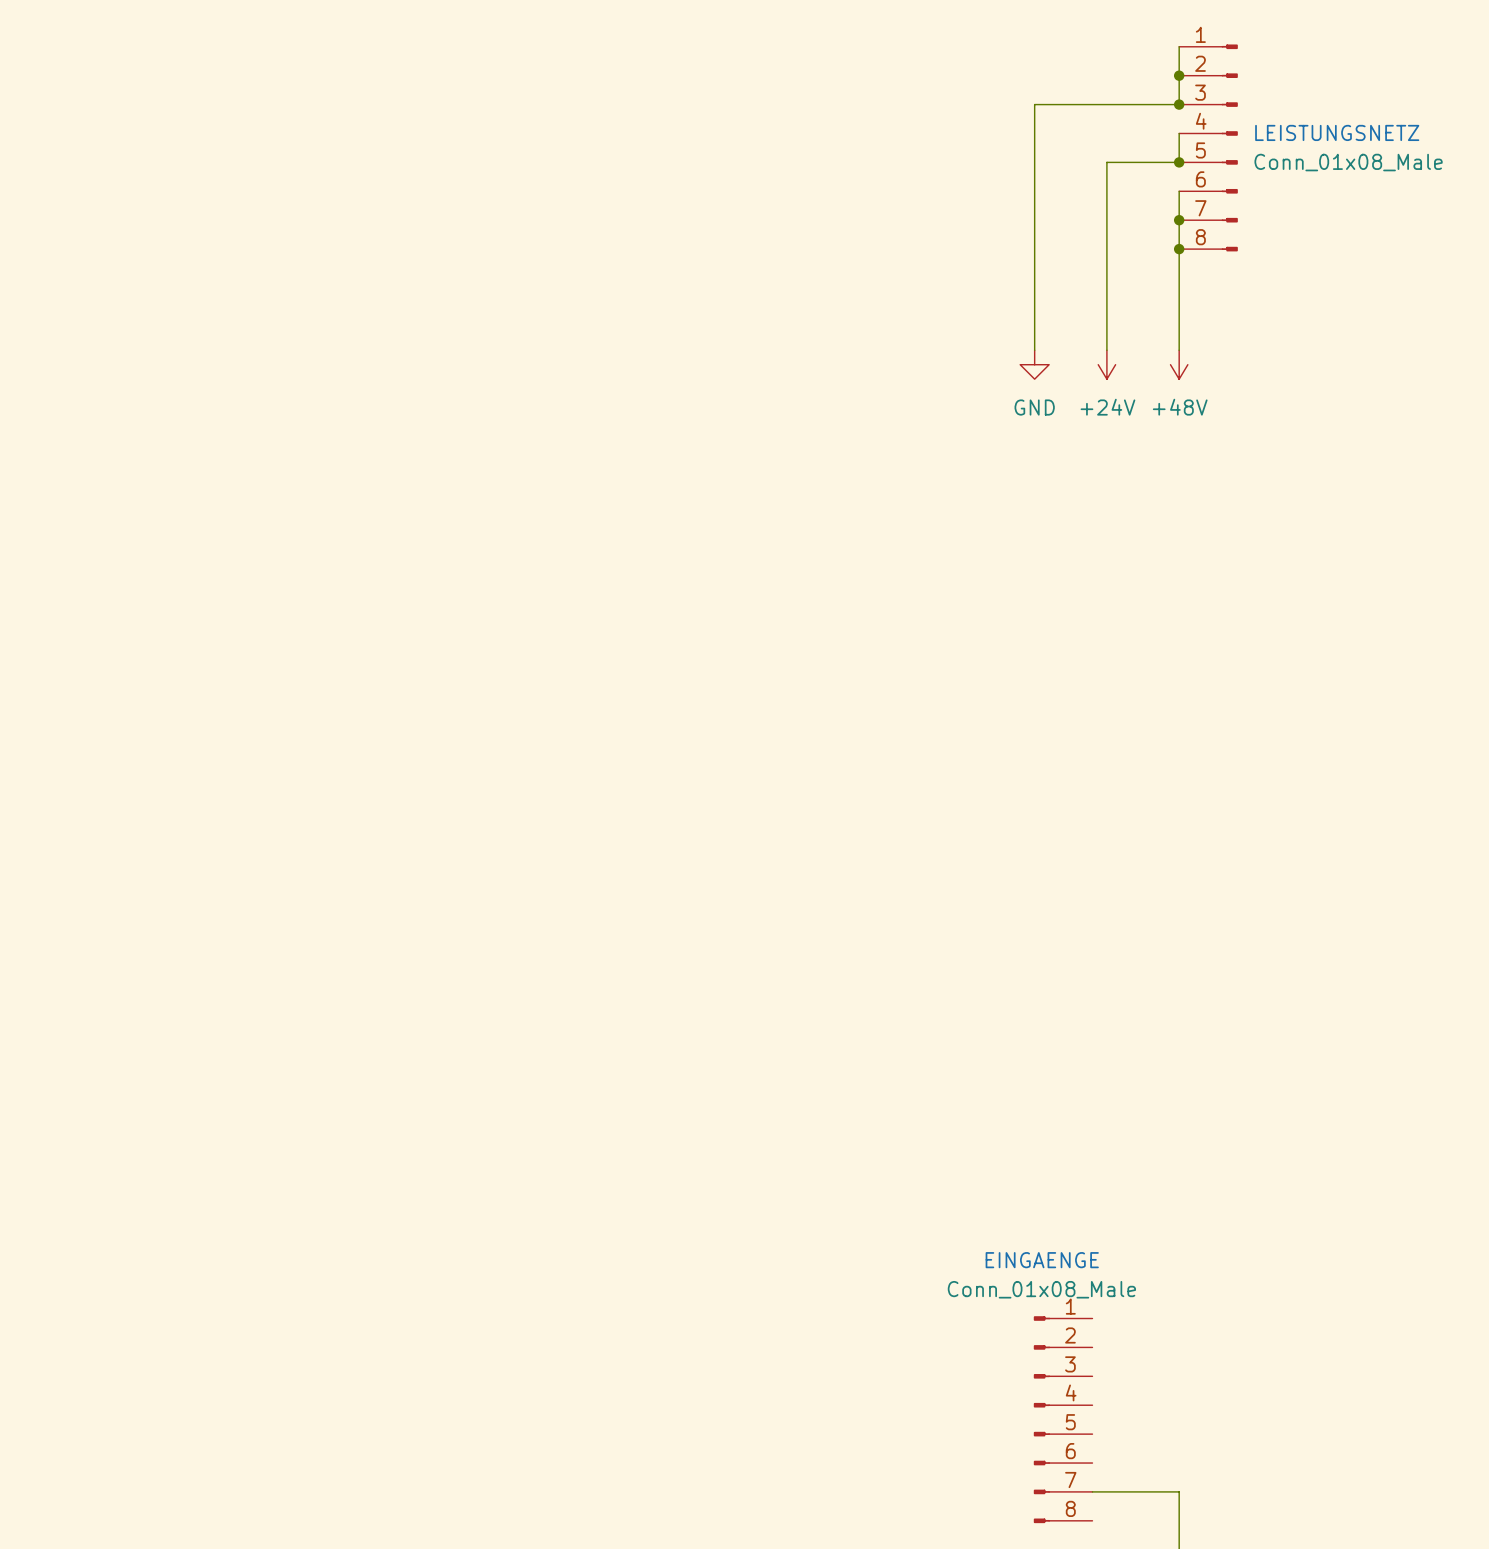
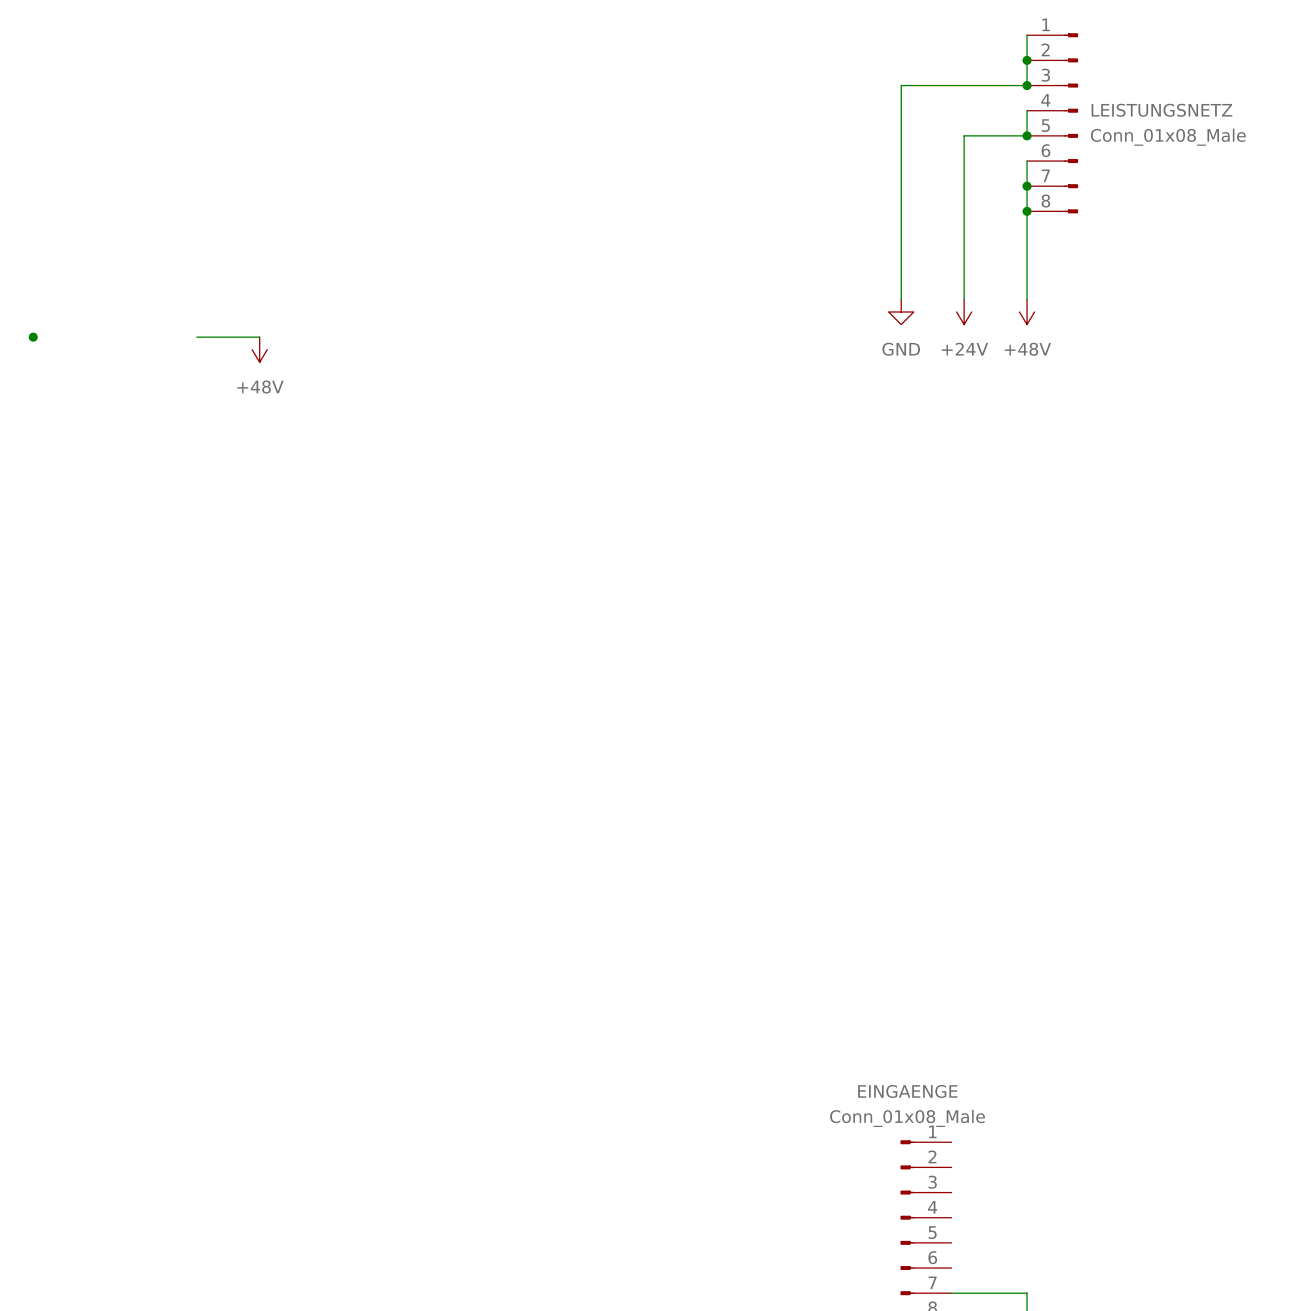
junction: none -> (33, 337)
wire: none -> (196, 337) (259, 337)
power symbol: none -> +48V (259, 349)

